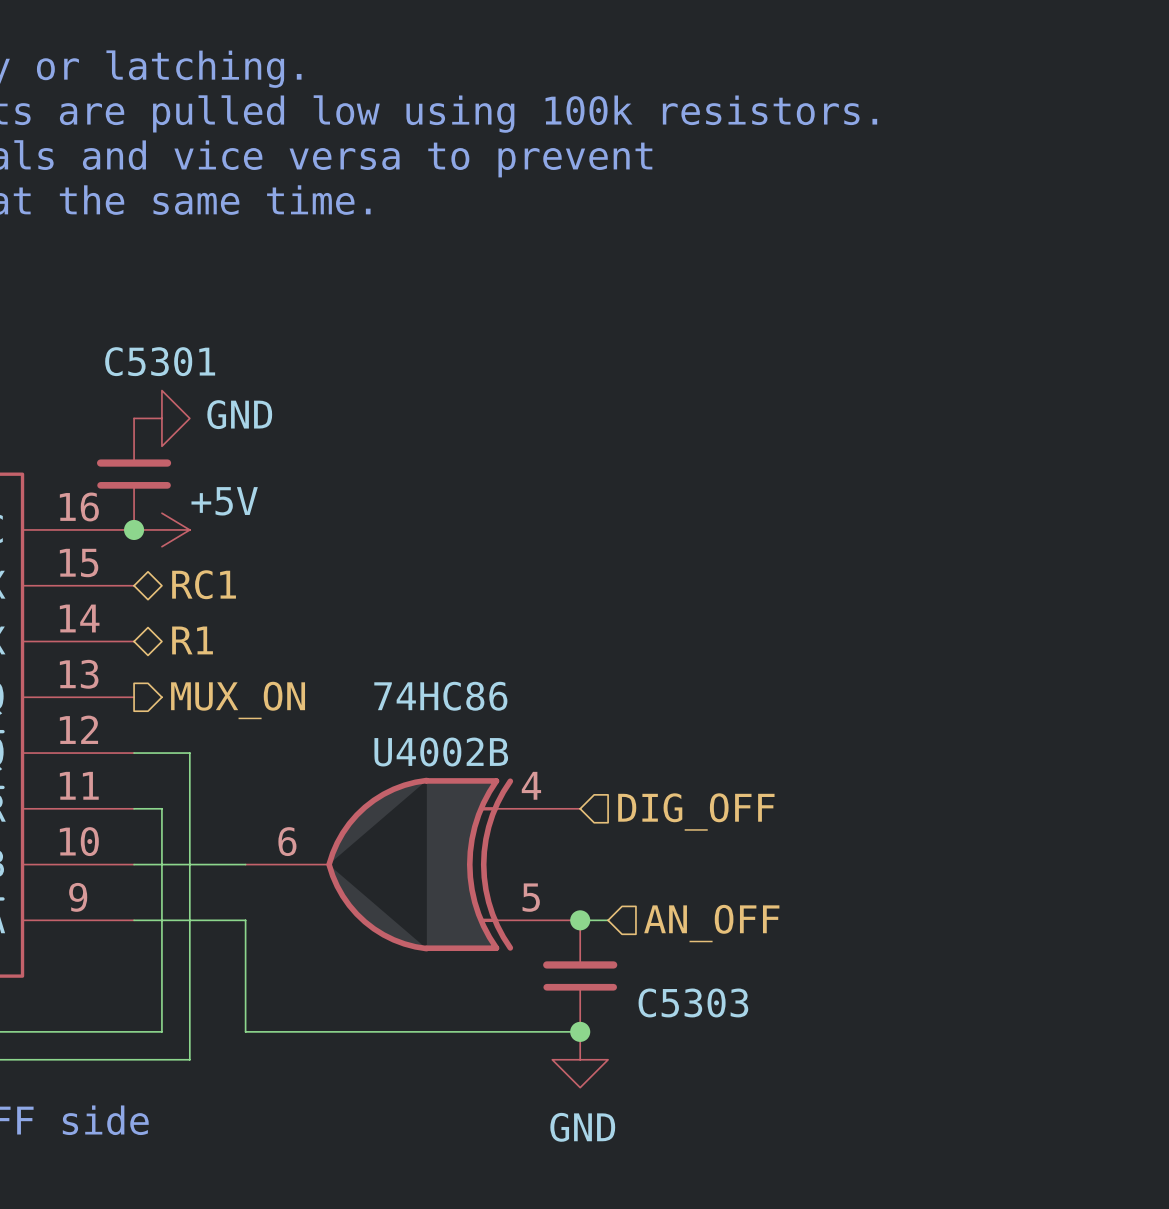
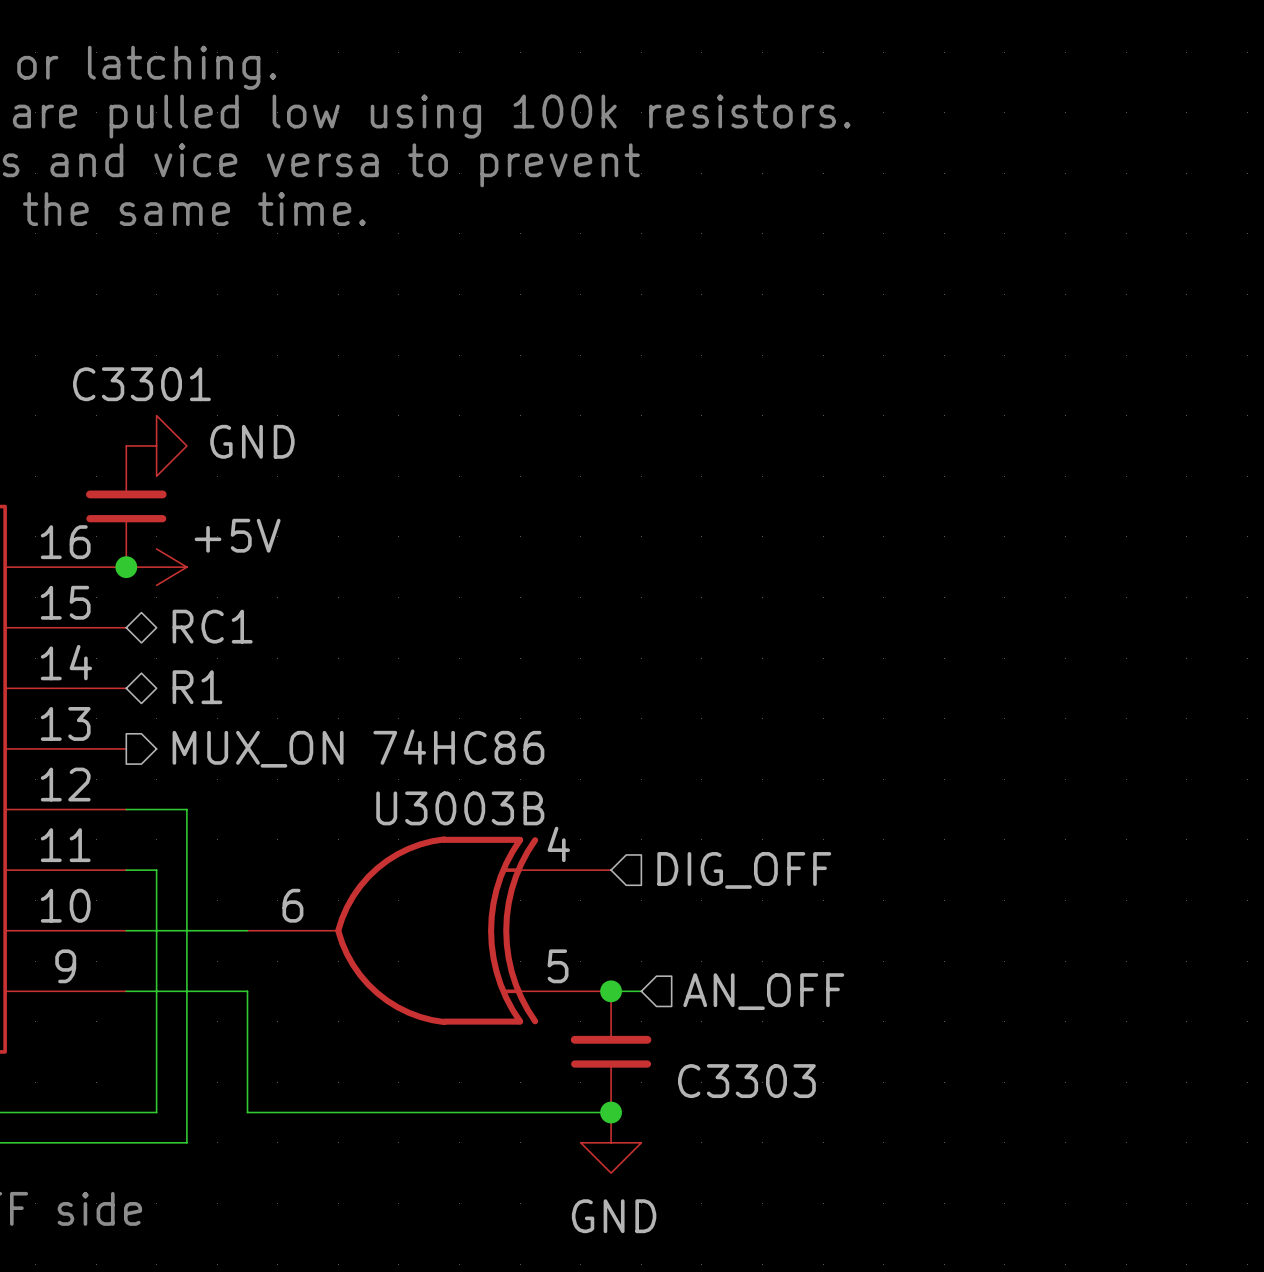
C5301 name: C5301 (160, 361) -> C3301 (141, 384)
U4002B name: U4002B (441, 752) -> U3003B (460, 808)
C5303 name: C5303 (693, 1002) -> C3303 (746, 1081)

